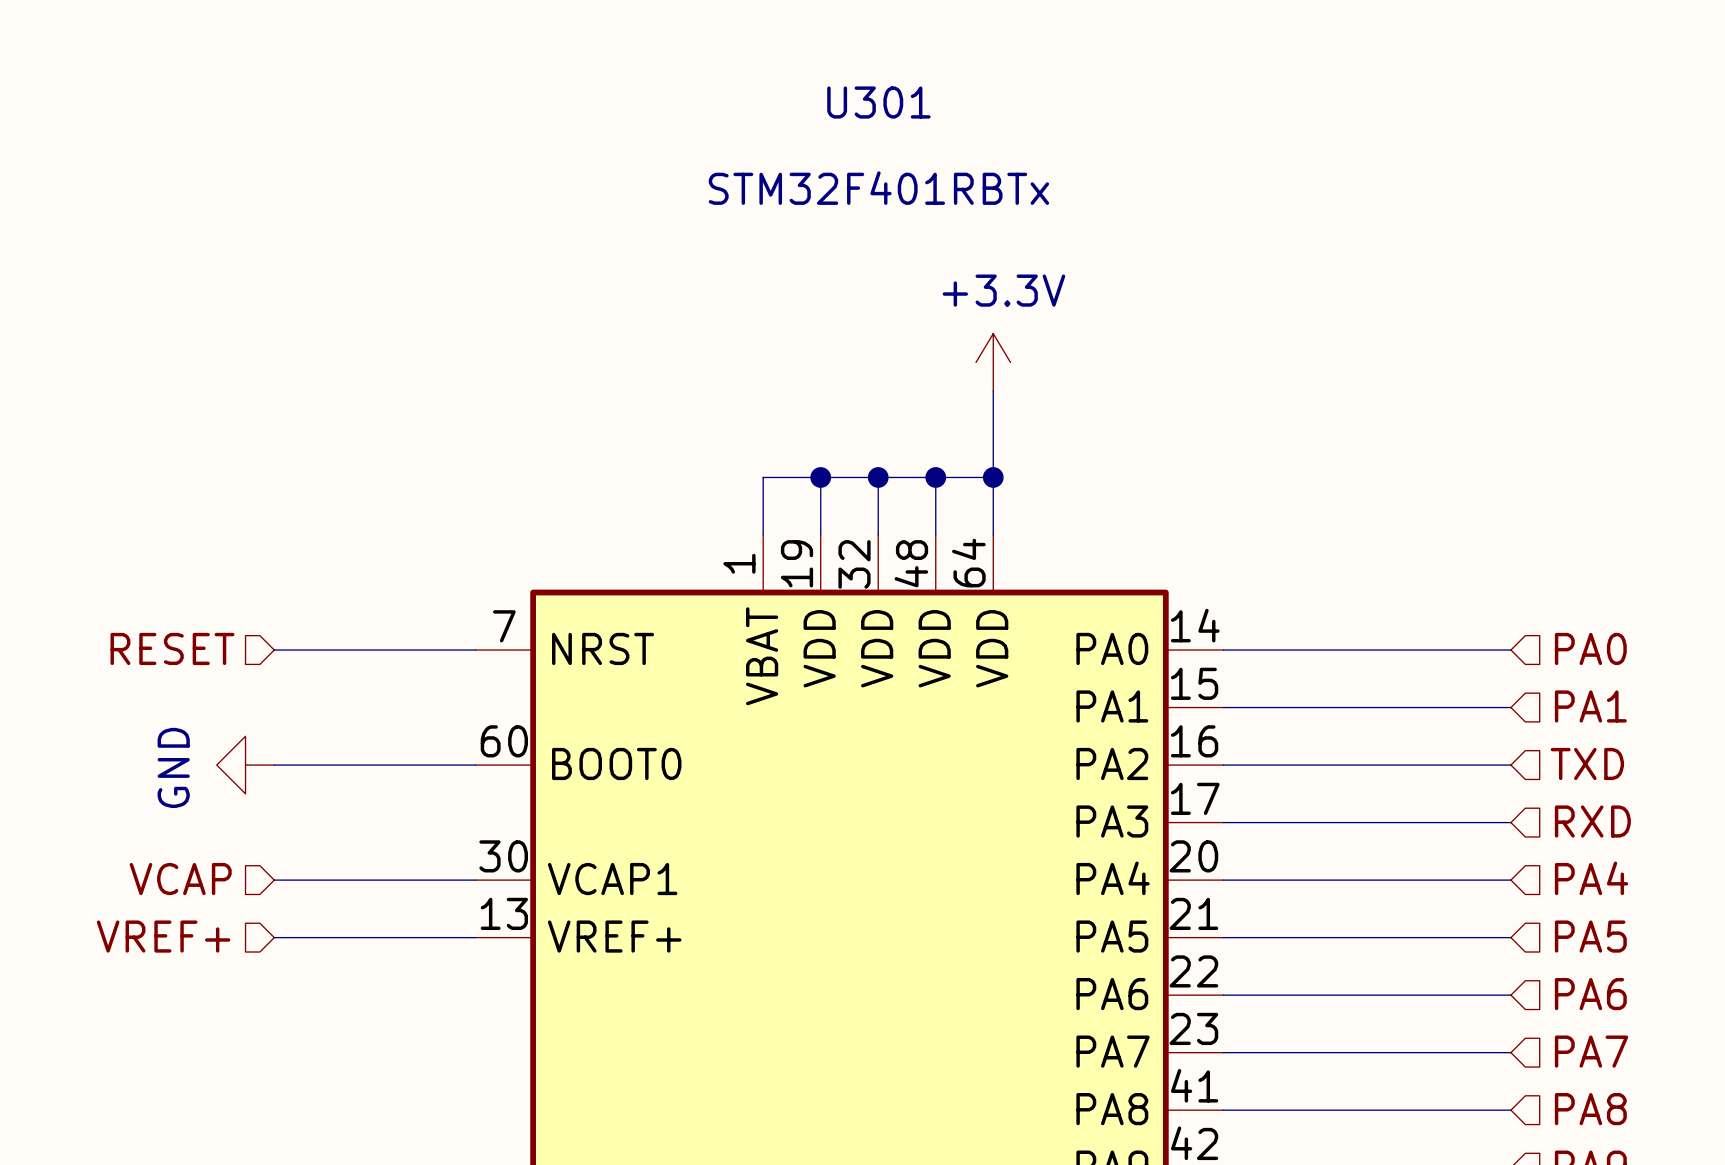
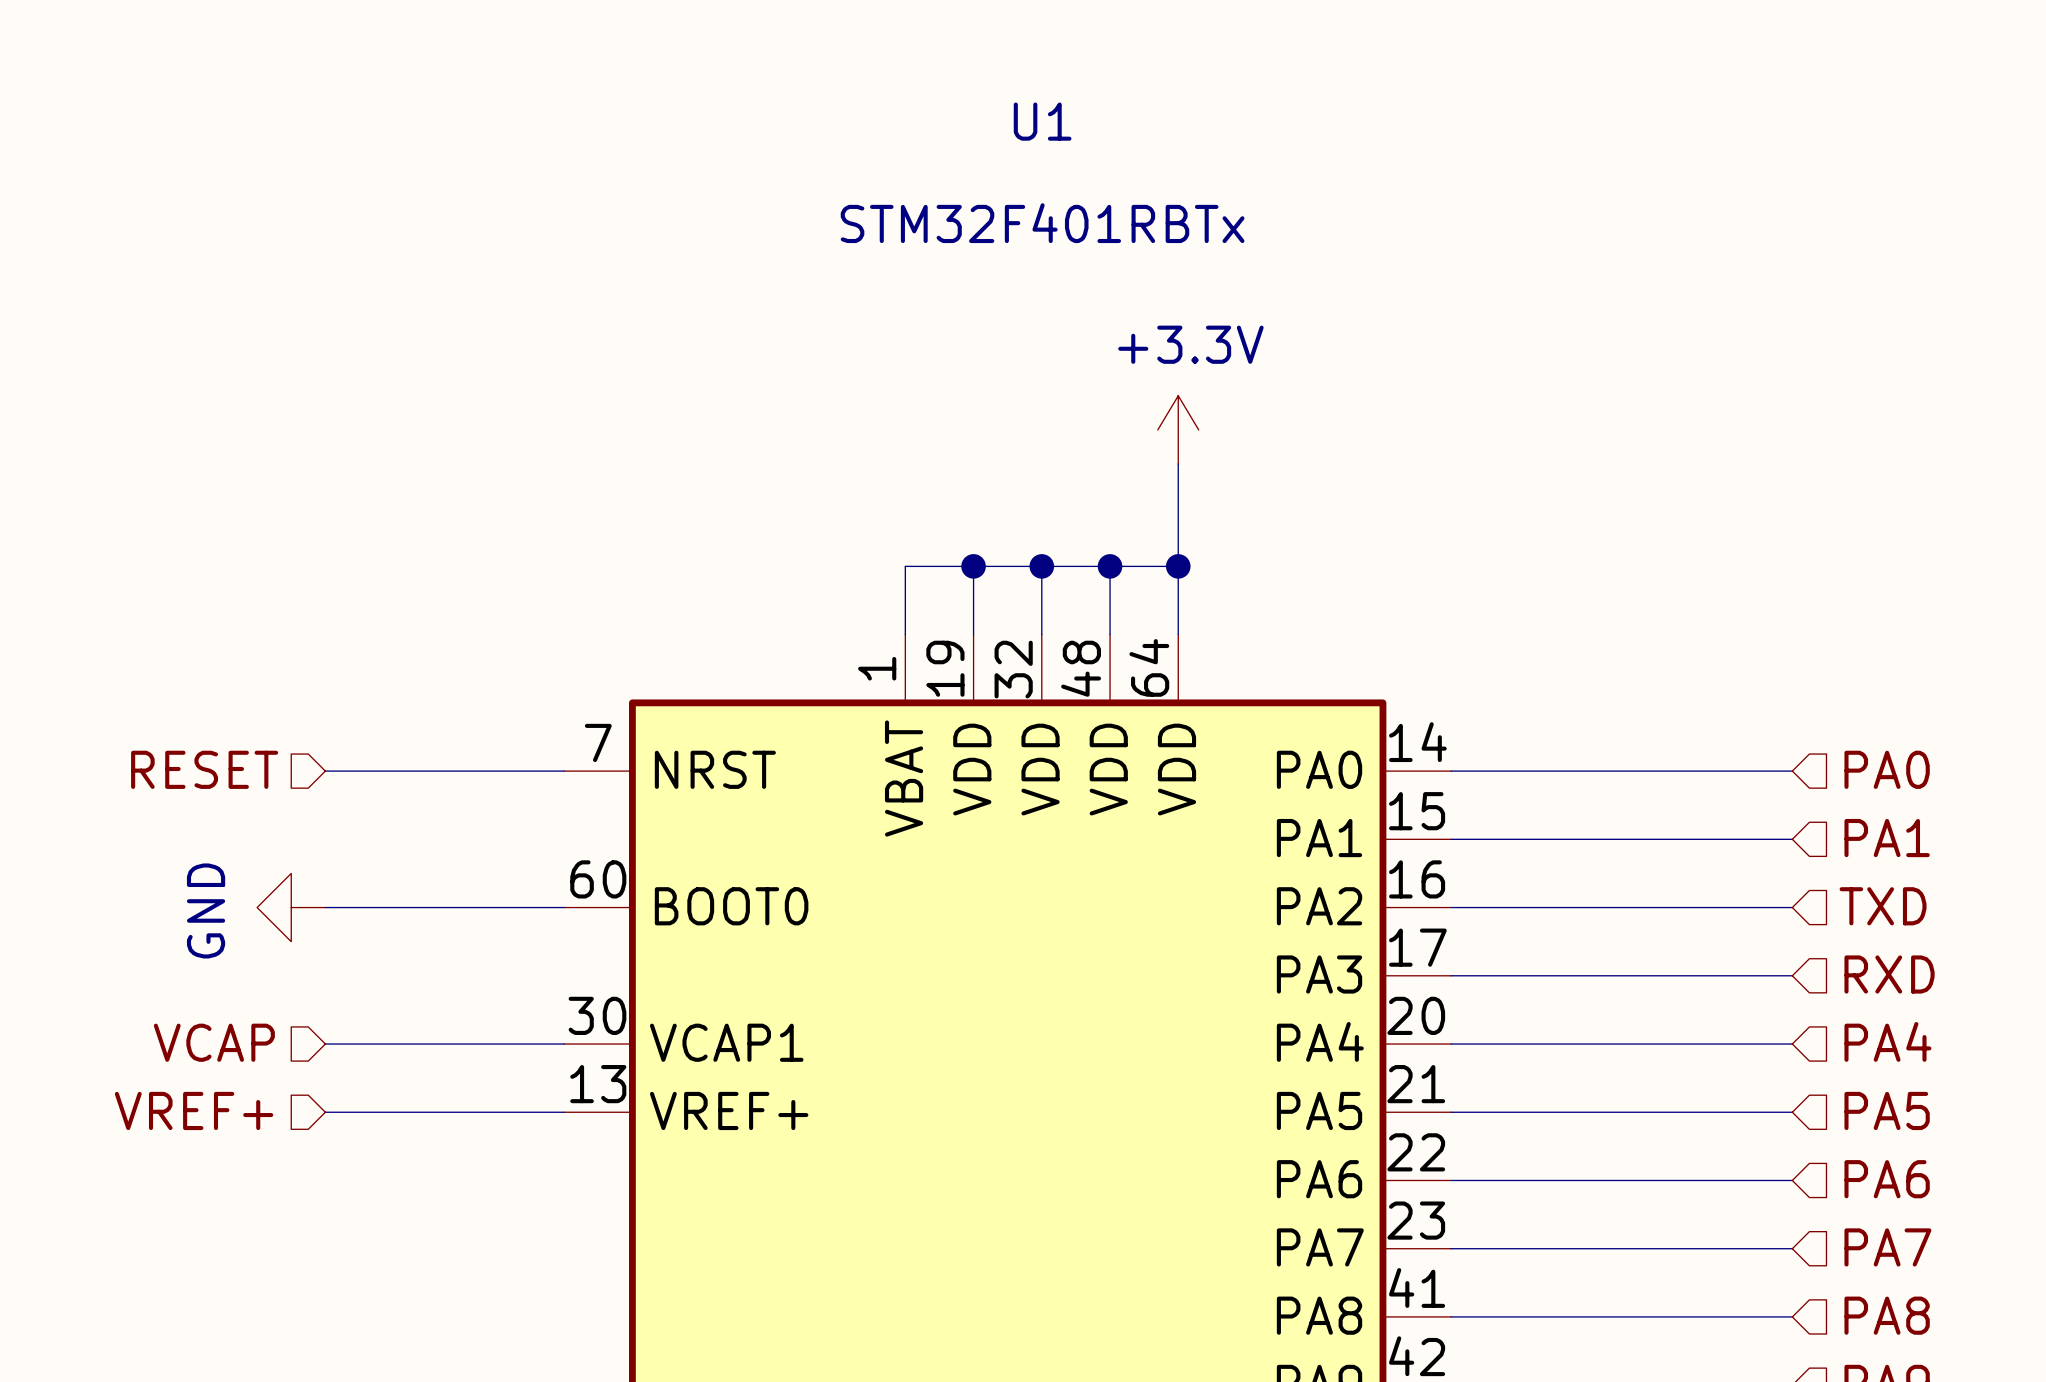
U301 name: U301 (878, 102) -> U1 (1042, 121)

